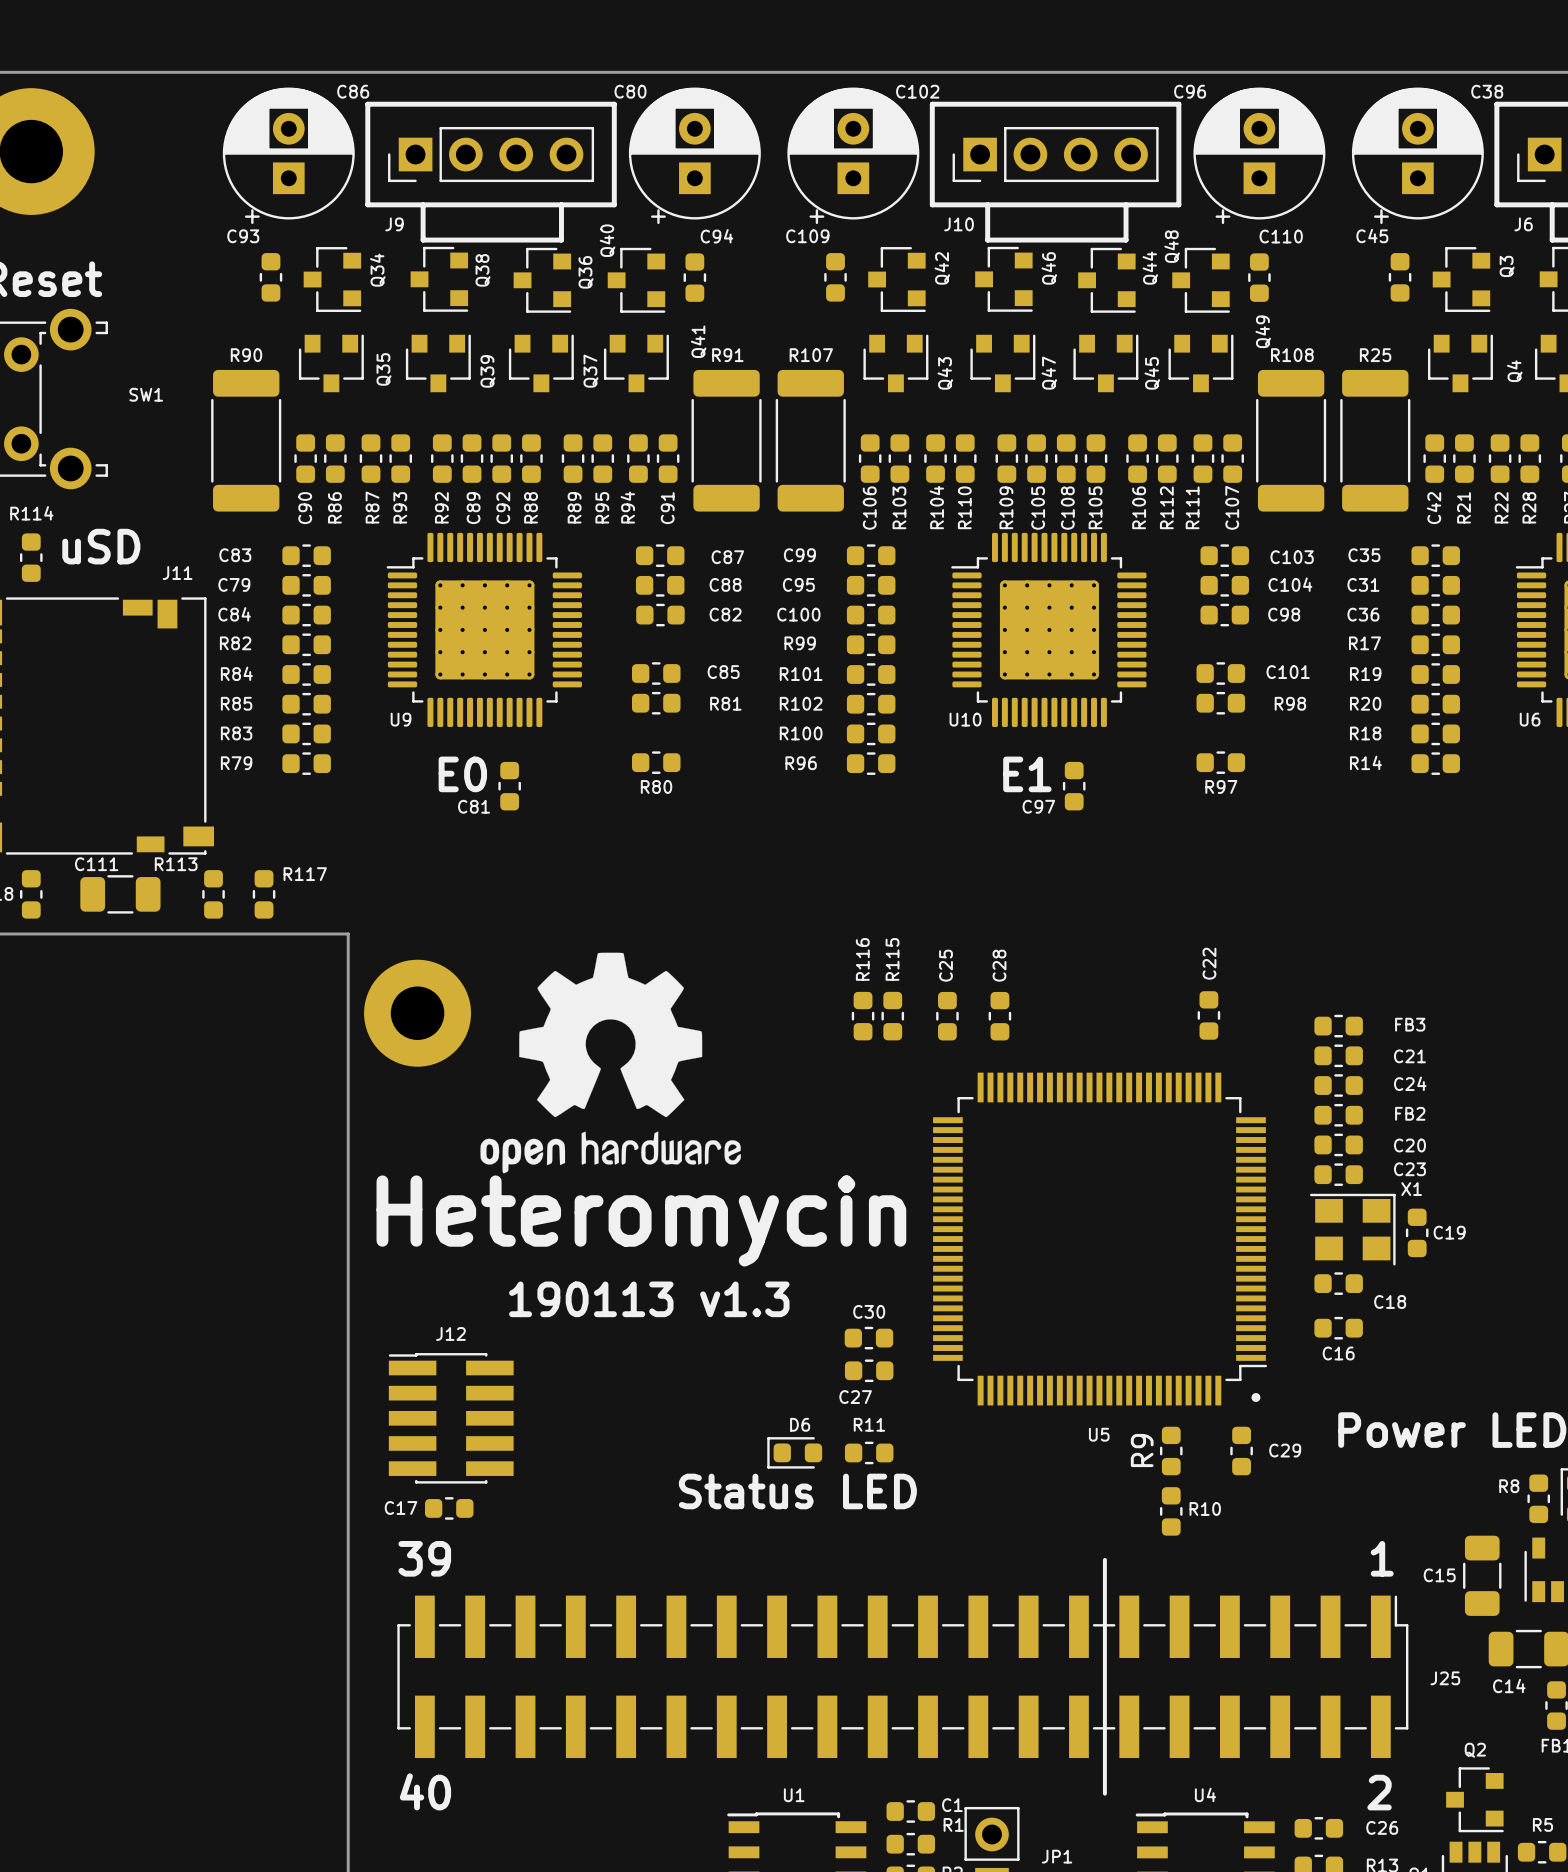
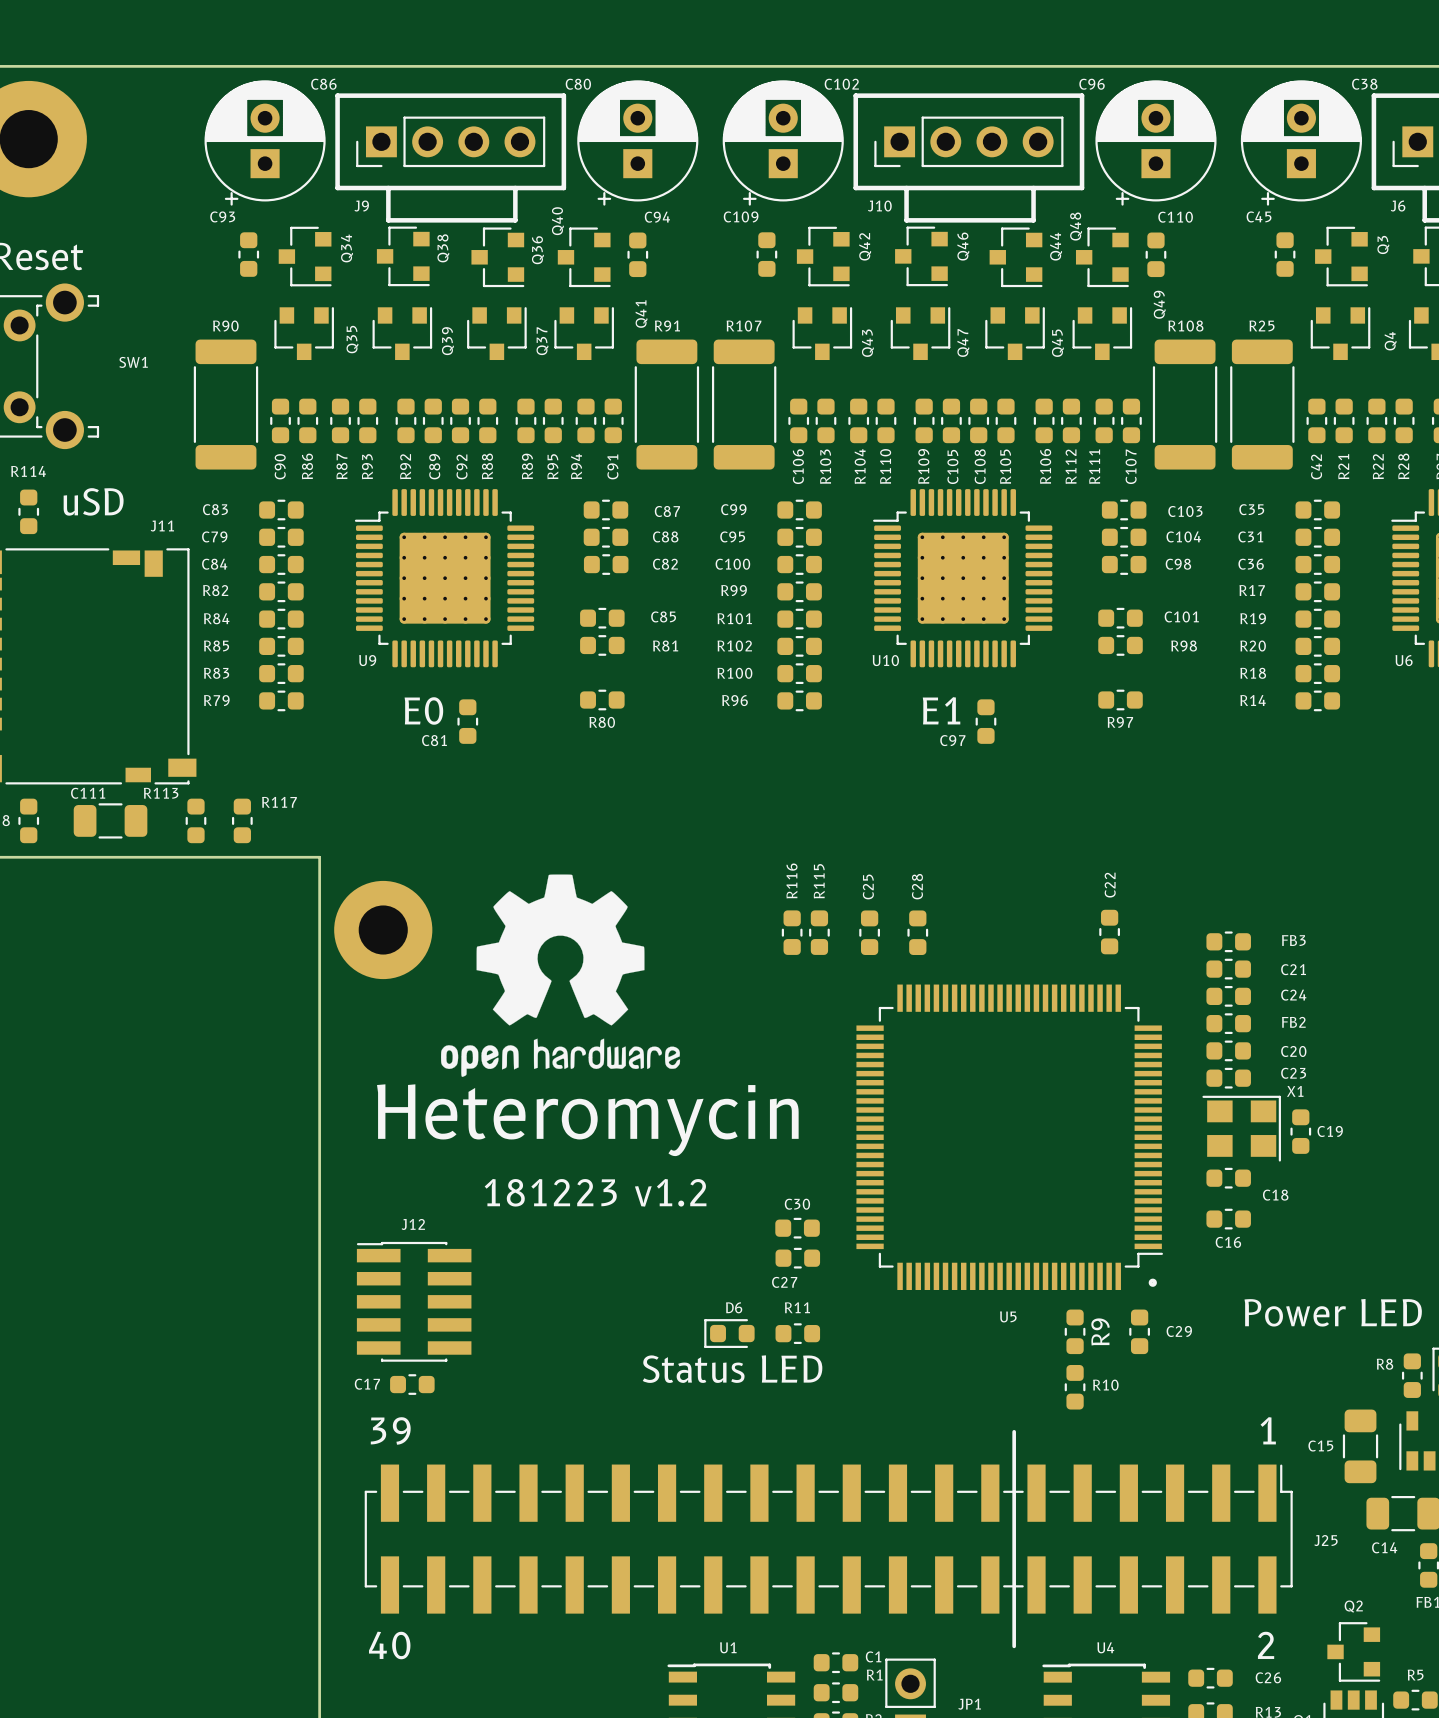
text: 190113 v1.3 (649, 1299) -> 181223 v1.2 (595, 1192)
R9 name position: R9 (1142, 1450) -> R9 (1100, 1331)

